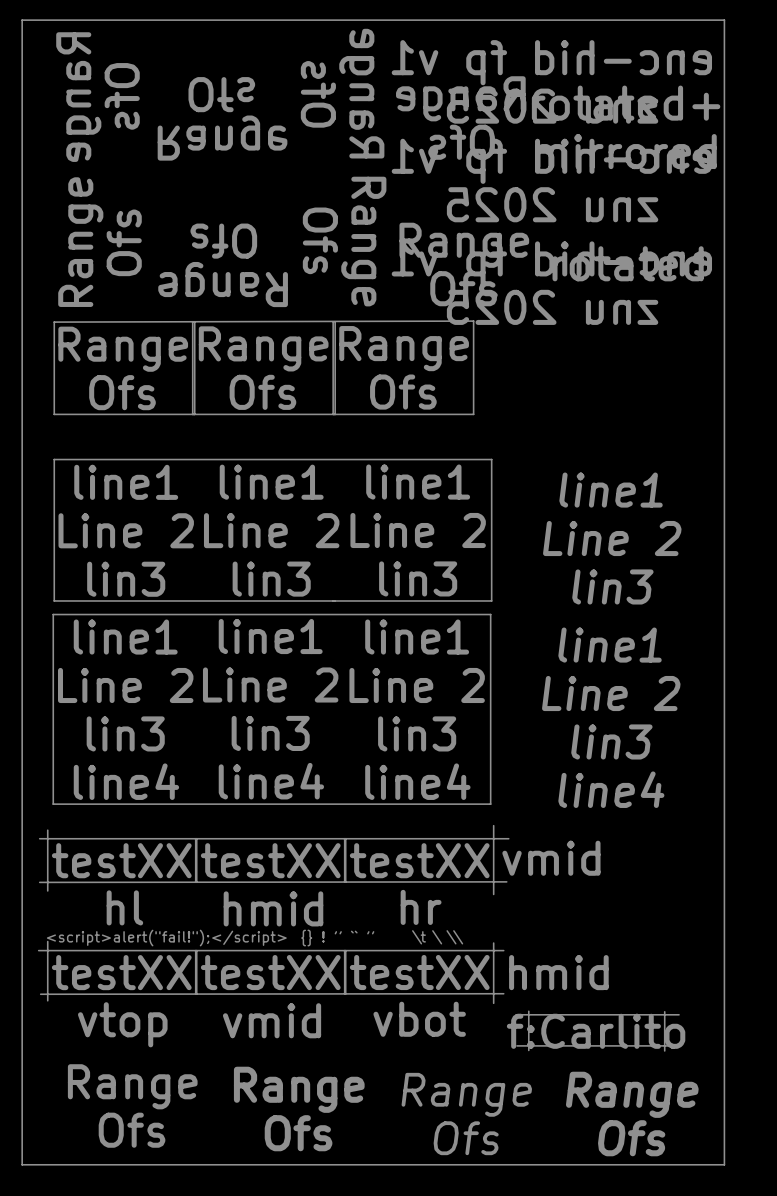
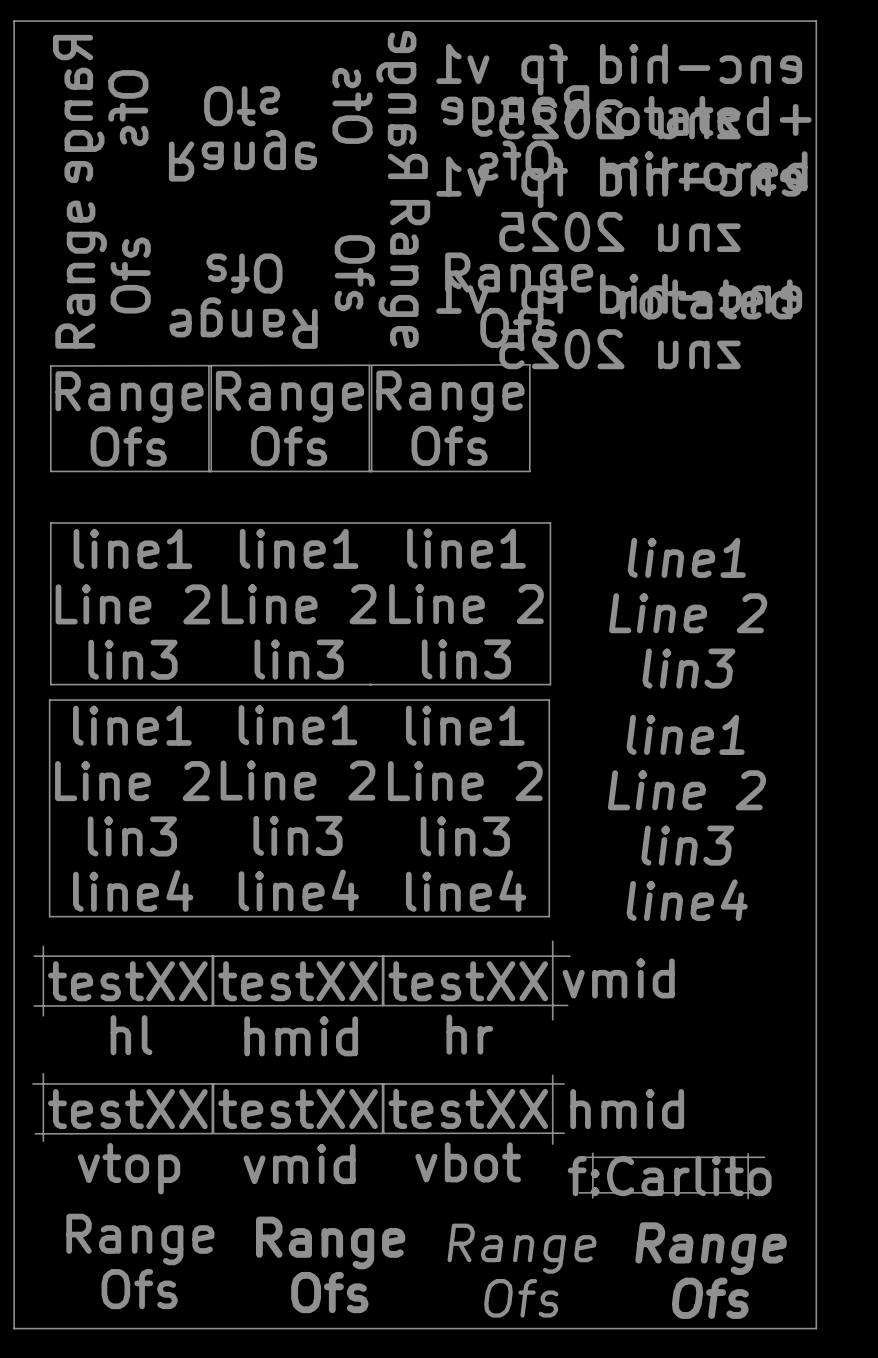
text: <script>alert("fail!");</script> (166, 938) -> none
text: {} ! '' `` '' \t \ \\ (382, 938) -> none

